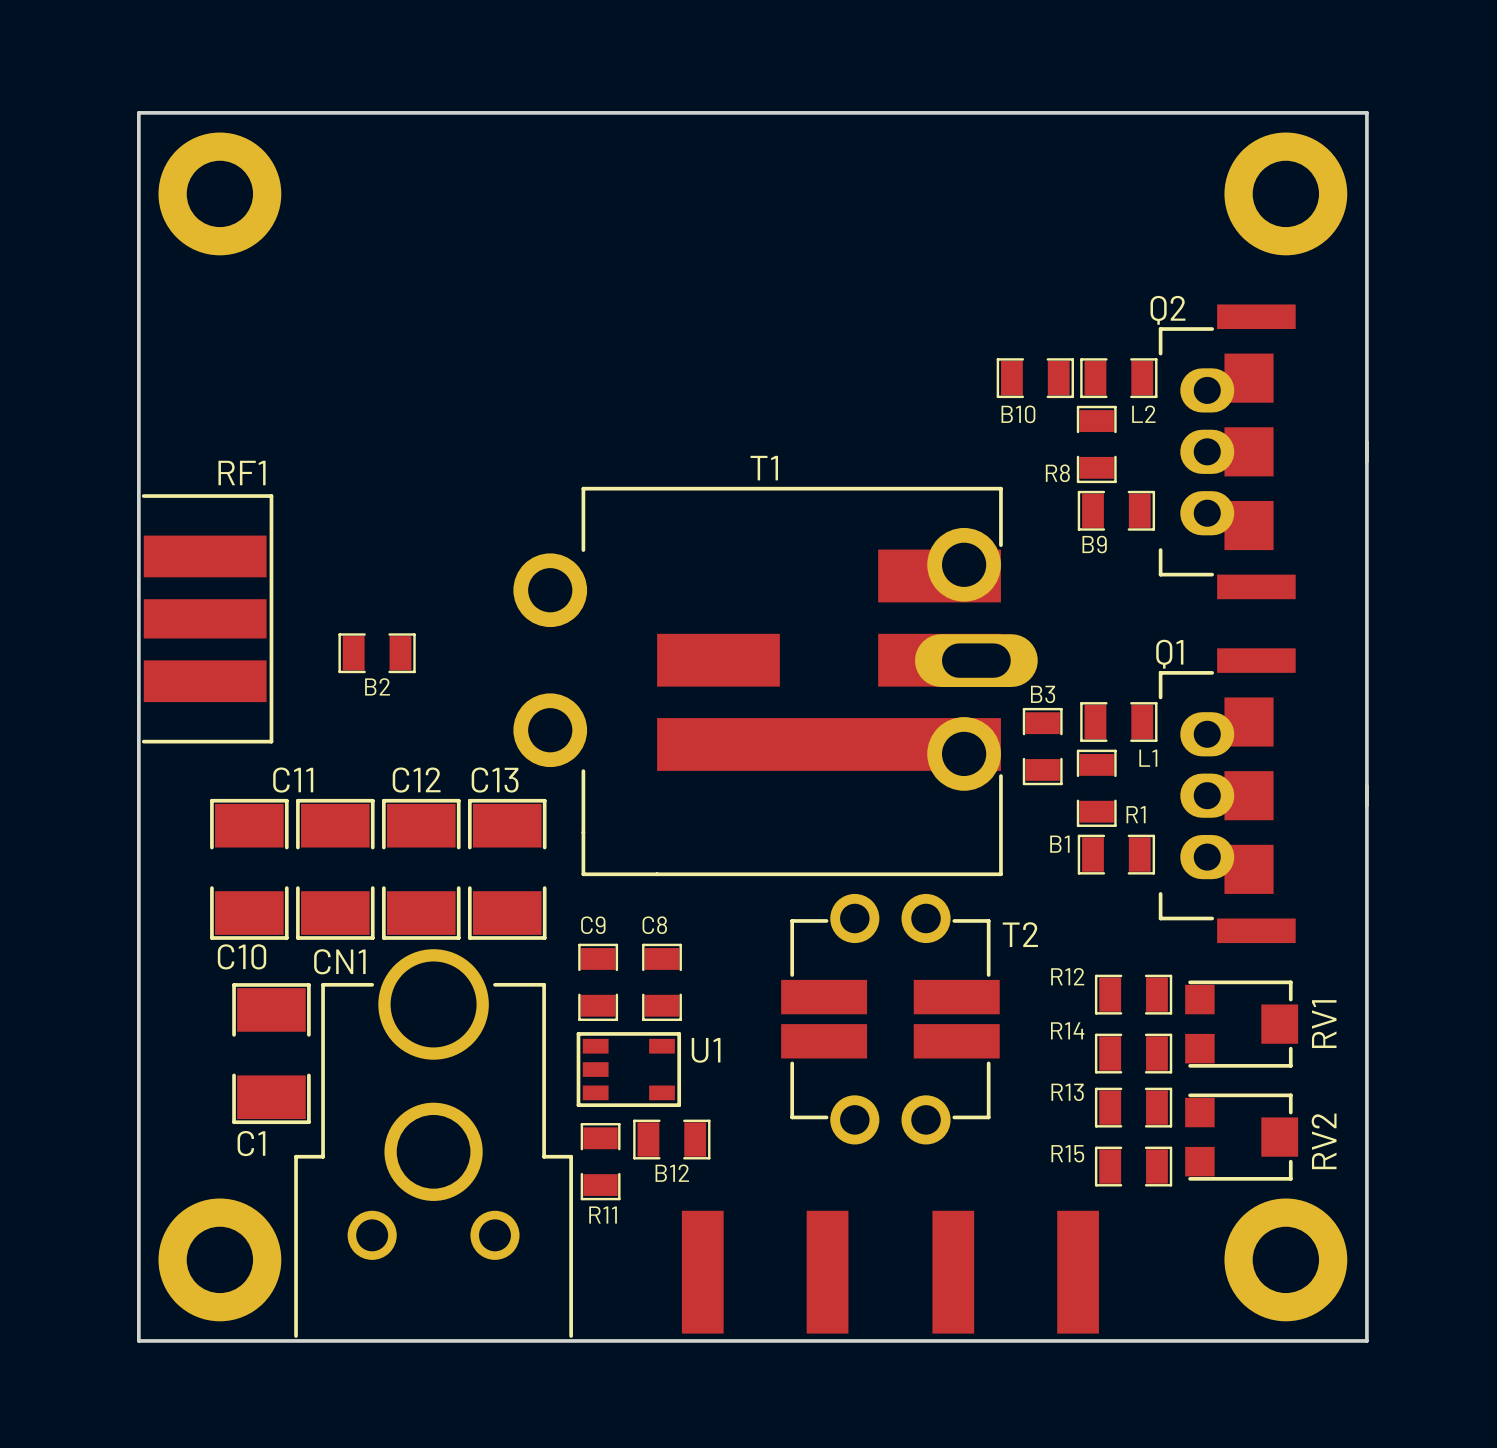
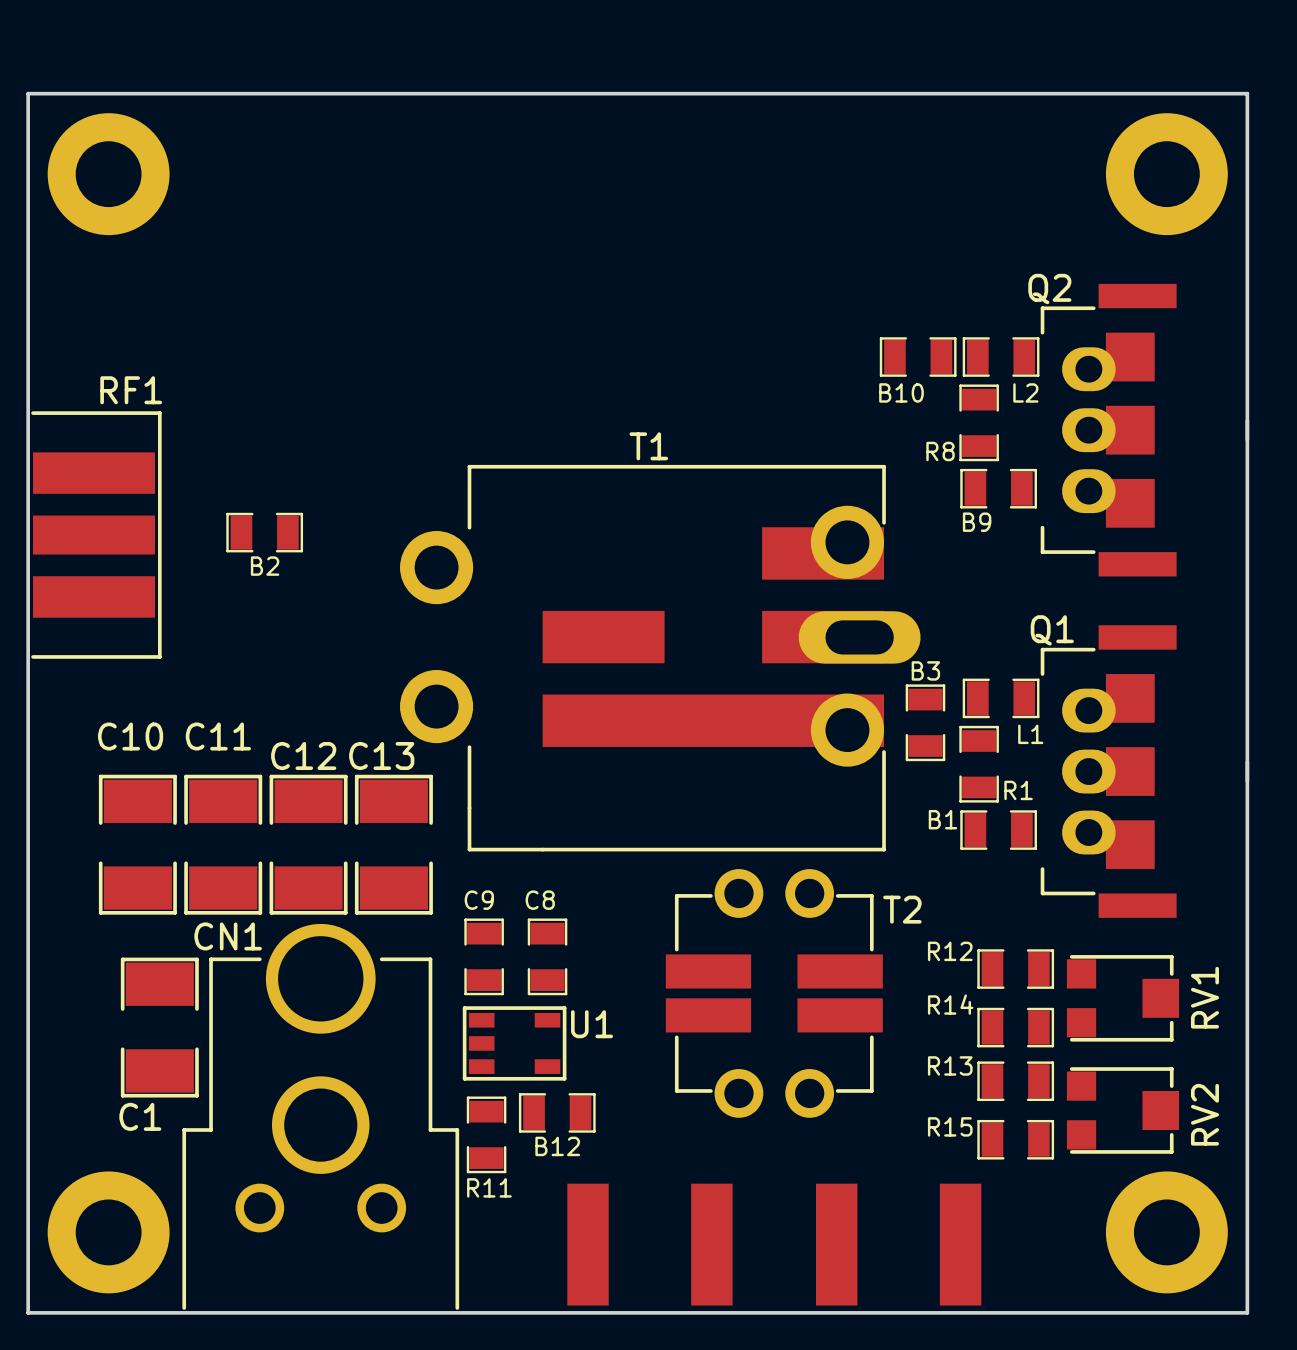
RF1 position: (207, 618) -> (96, 535)
B2 position: (377, 653) -> (264, 532)
C11 name position: C11 (293, 780) -> C11 (218, 736)
C10 name position: C10 (242, 956) -> C10 (130, 736)

